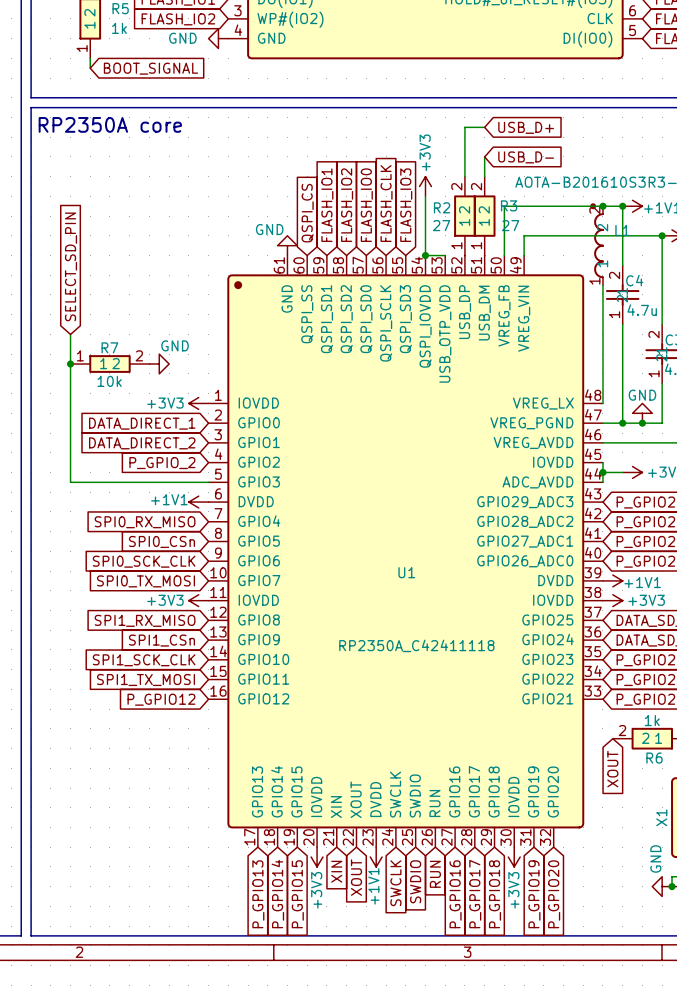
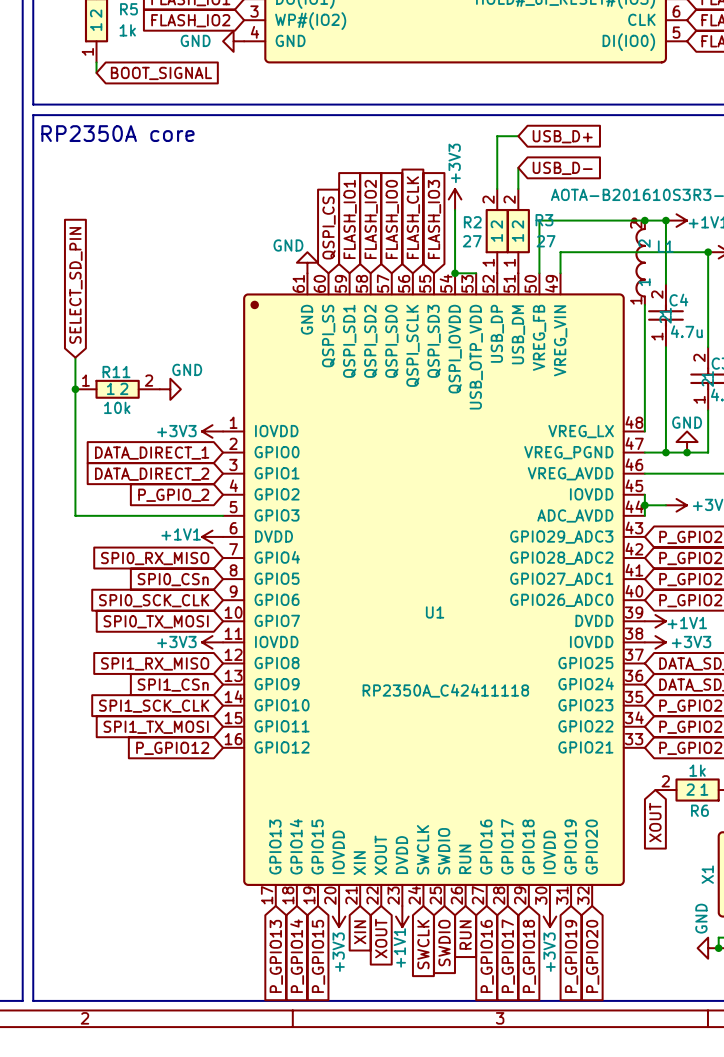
R7 name: R7 (109, 347) -> R11 (116, 372)

